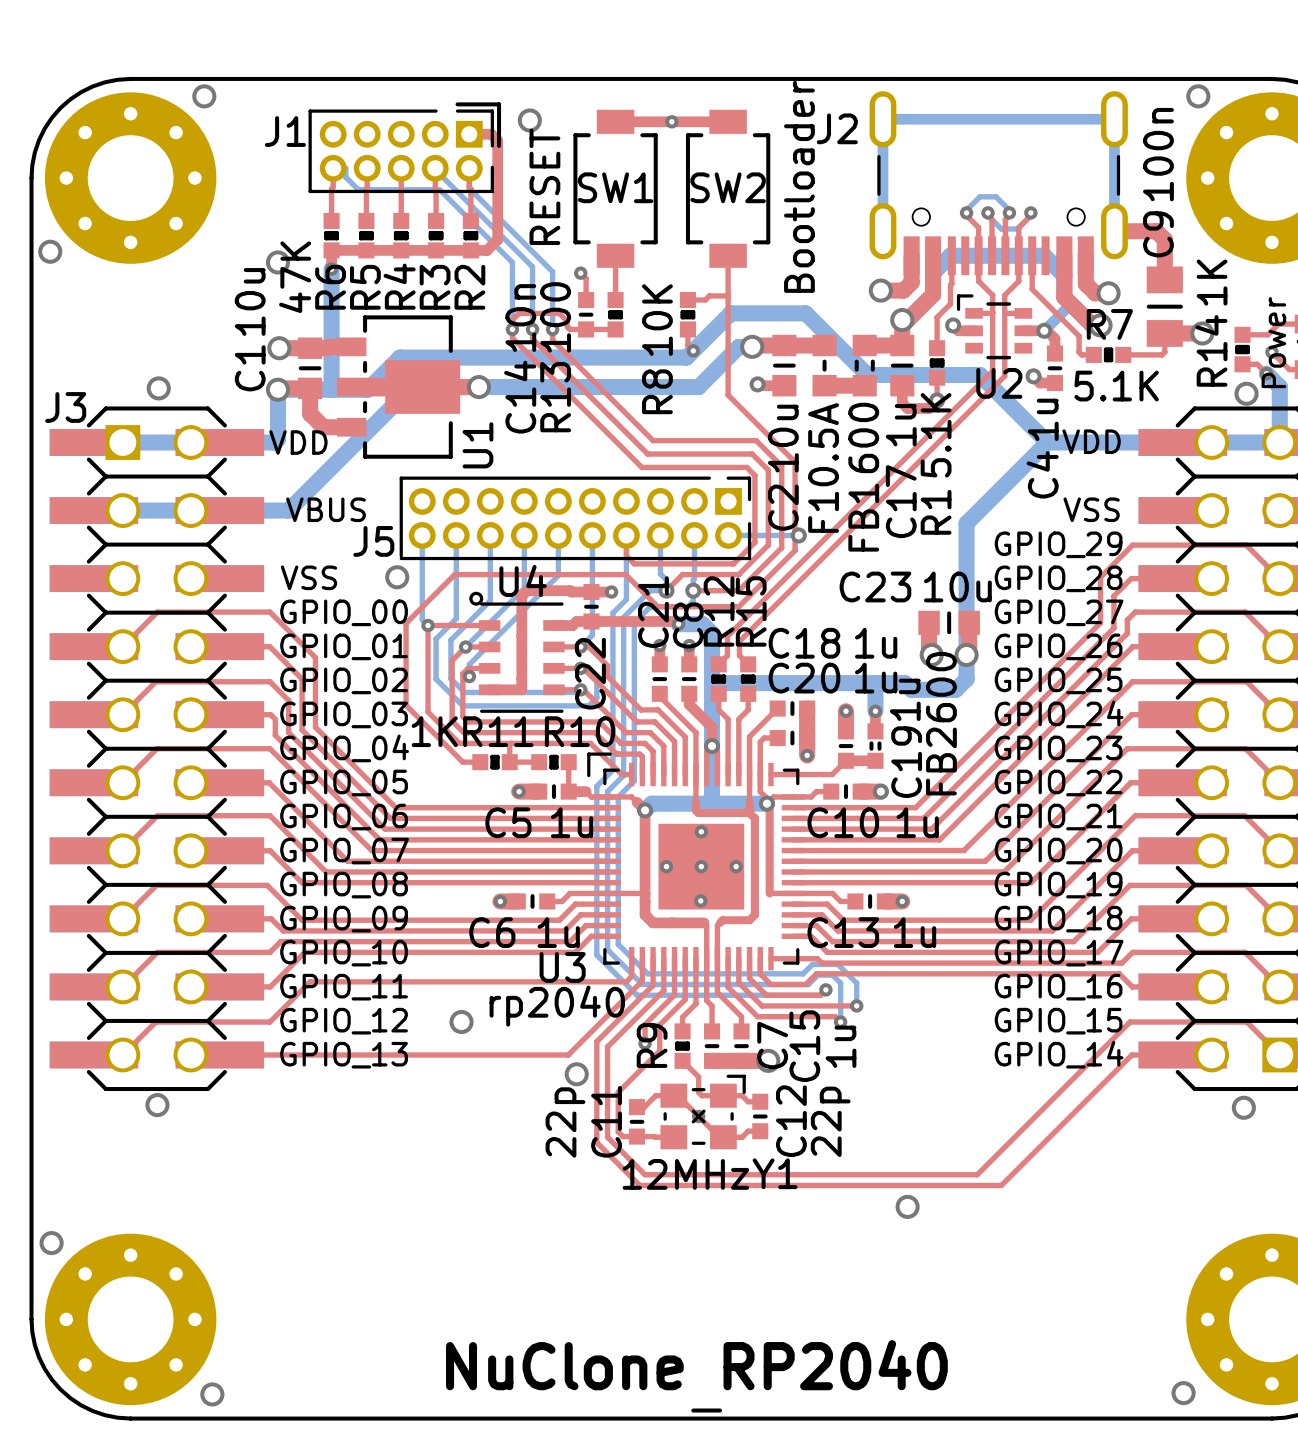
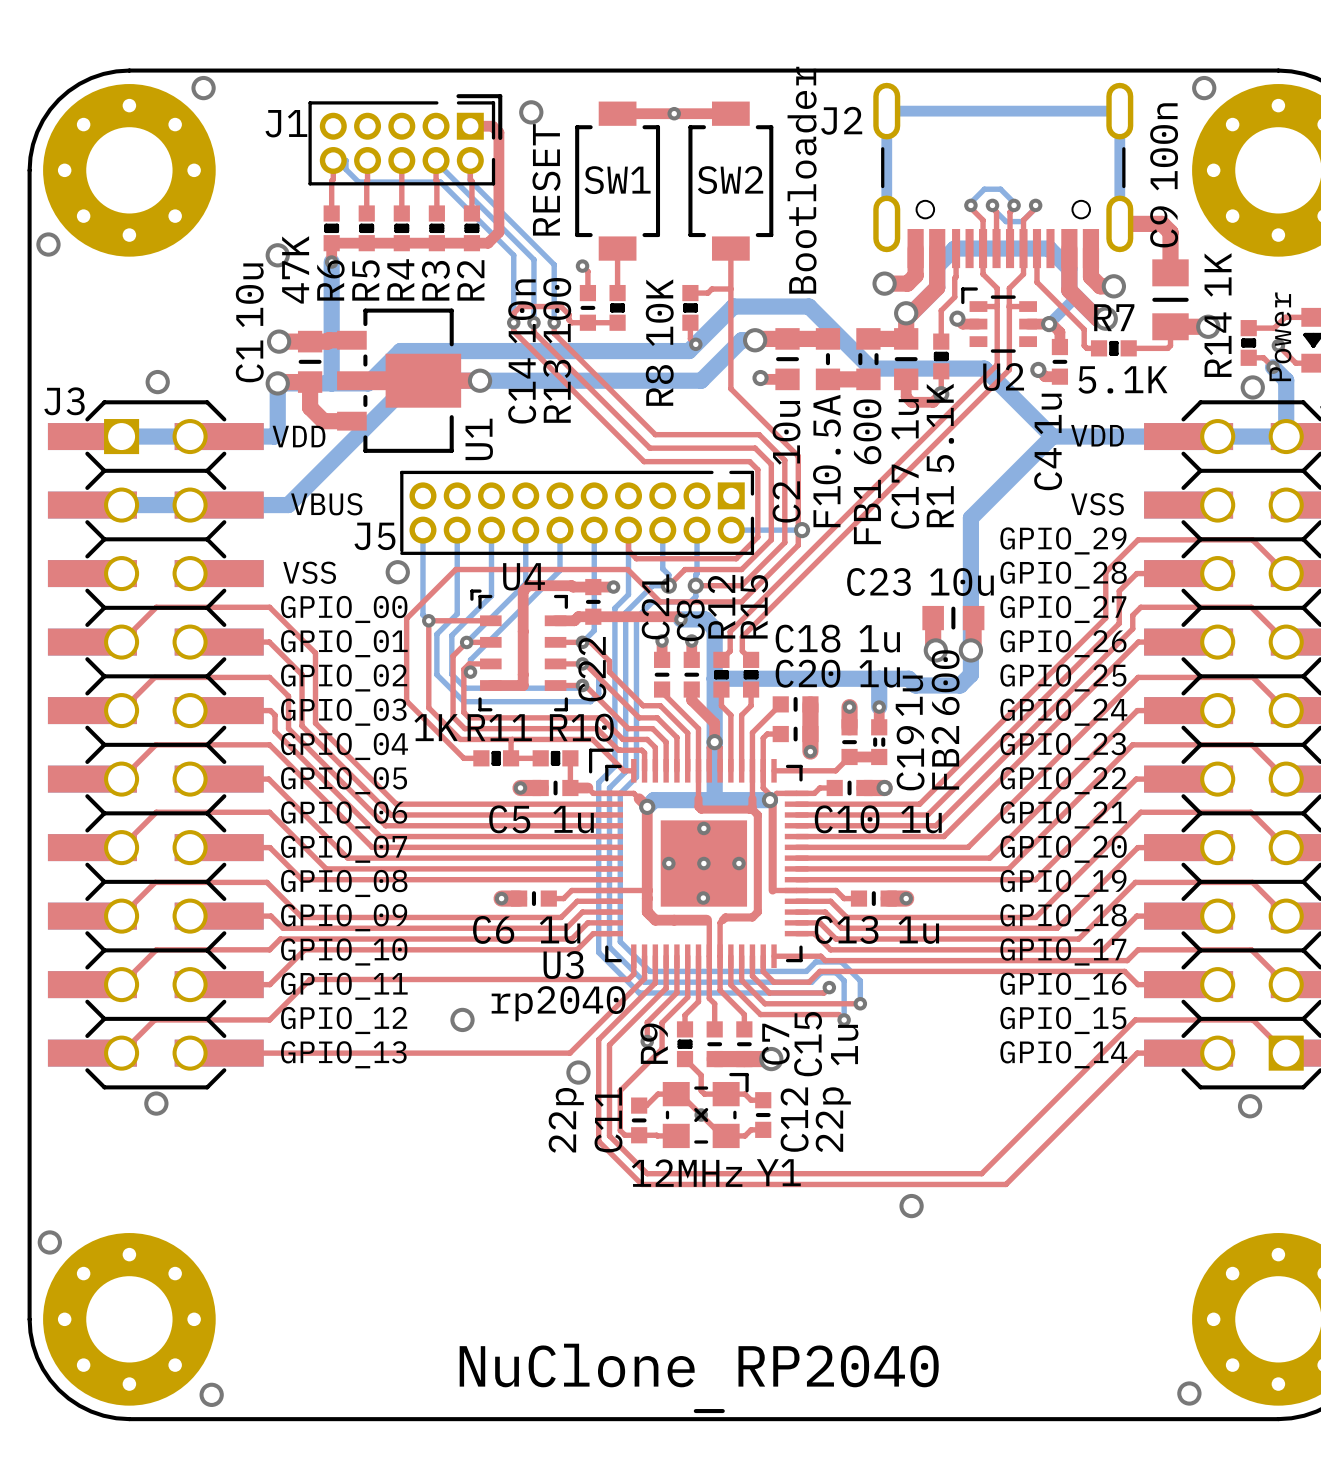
U4 footprint: [469, 591, 565, 713] -> [470, 589, 568, 712]

